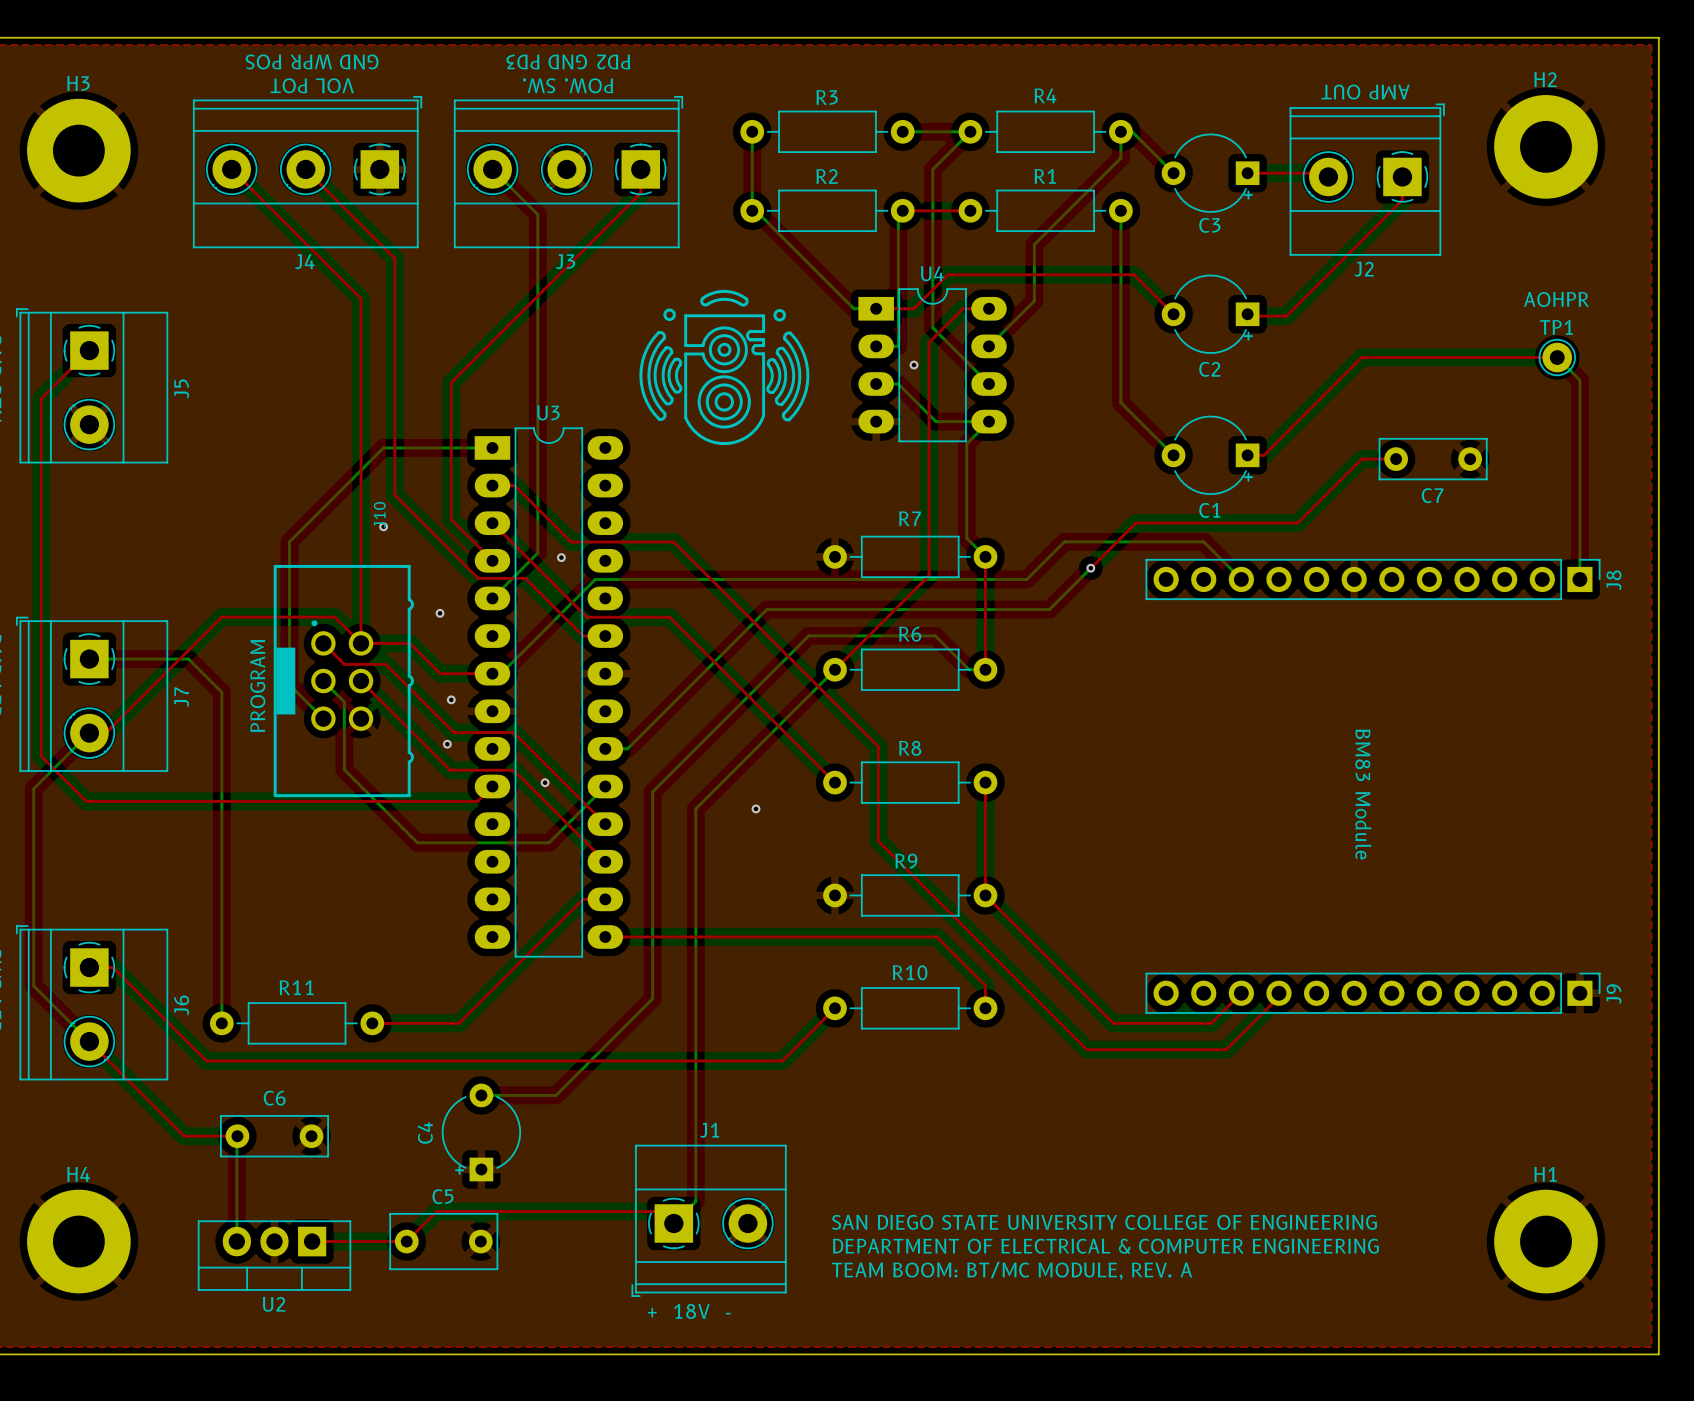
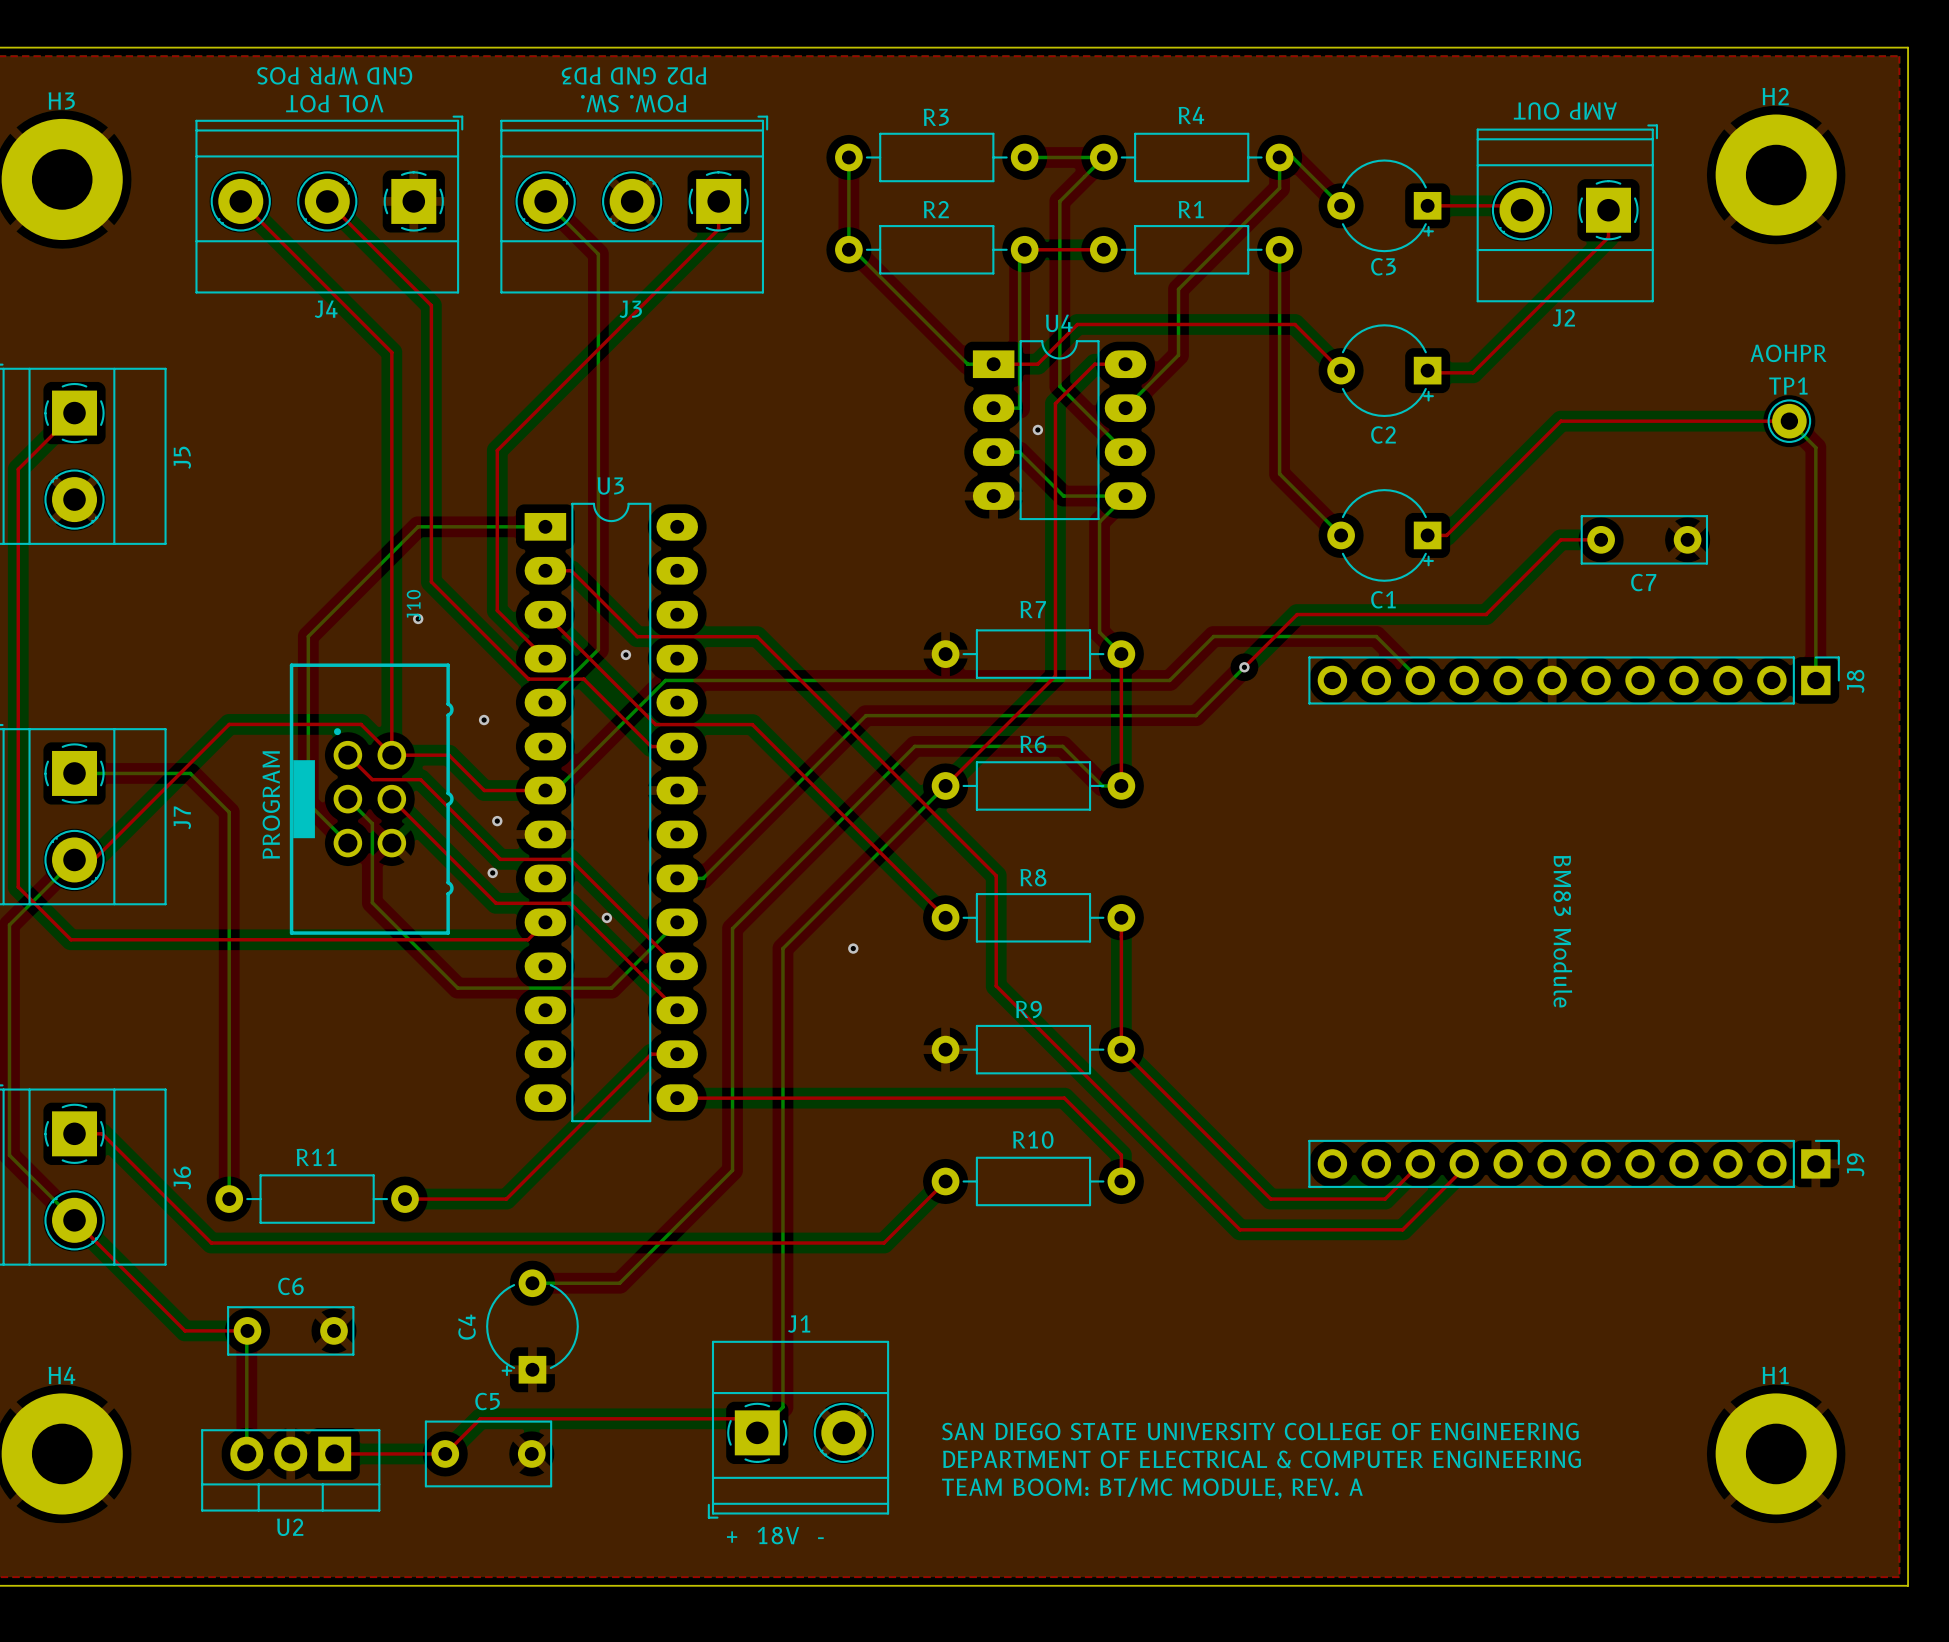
line: (702, 298) (715, 292) (724, 291) (738, 294) (746, 299) (747, 301) (742, 305) (731, 300) (721, 299) (705, 304) (701, 302) (702, 298) -> none
drawing: [663, 308, 676, 322] -> none
drawing: [773, 308, 786, 322] -> none
line: (685, 315) (685, 345) (702, 345) (709, 333) (722, 327) (735, 331) (744, 341) (746, 352) (743, 360) (738, 366) (728, 371) (719, 371) (711, 367) (706, 361) (702, 353) (685, 353) (685, 417) (687, 422) (697, 433) (710, 441) (725, 443) (740, 440) (752, 432) (763, 415) (763, 353) (755, 353) (752, 349) (755, 345) (763, 345) (763, 339) (750, 339) (747, 335) (750, 331) (763, 331) (763, 315) (685, 315) -> none
line: (658, 332) (650, 343) (644, 355) (640, 376) (642, 389) (647, 402) (654, 414) (660, 419) (664, 417) (664, 413) (651, 393) (648, 375) (651, 358) (664, 337) (663, 333) (658, 332) -> none
line: (790, 333) (799, 344) (804, 356) (807, 376) (806, 390) (801, 403) (793, 414) (787, 419) (784, 418) (783, 414) (796, 394) (799, 376) (797, 359) (784, 338) (785, 334) (790, 333) -> none
drawing: [697, 334, 751, 429] -> none
line: (665, 348) (657, 360) (655, 375) (658, 390) (668, 404) (672, 399) (664, 383) (663, 371) (671, 352) (669, 348) (665, 348) -> none
line: (783, 348) (779, 348) (777, 352) (785, 371) (784, 384) (776, 399) (780, 404) (790, 391) (793, 376) (791, 361) (783, 348) -> none
line: (674, 359) (670, 367) (668, 375) (672, 387) (677, 392) (680, 388) (676, 375) (680, 362) (678, 359) (674, 359) -> none
line: (774, 360) (770, 359) (768, 363) (772, 376) (767, 389) (771, 392) (776, 387) (779, 376) (778, 367) (774, 360) -> none

